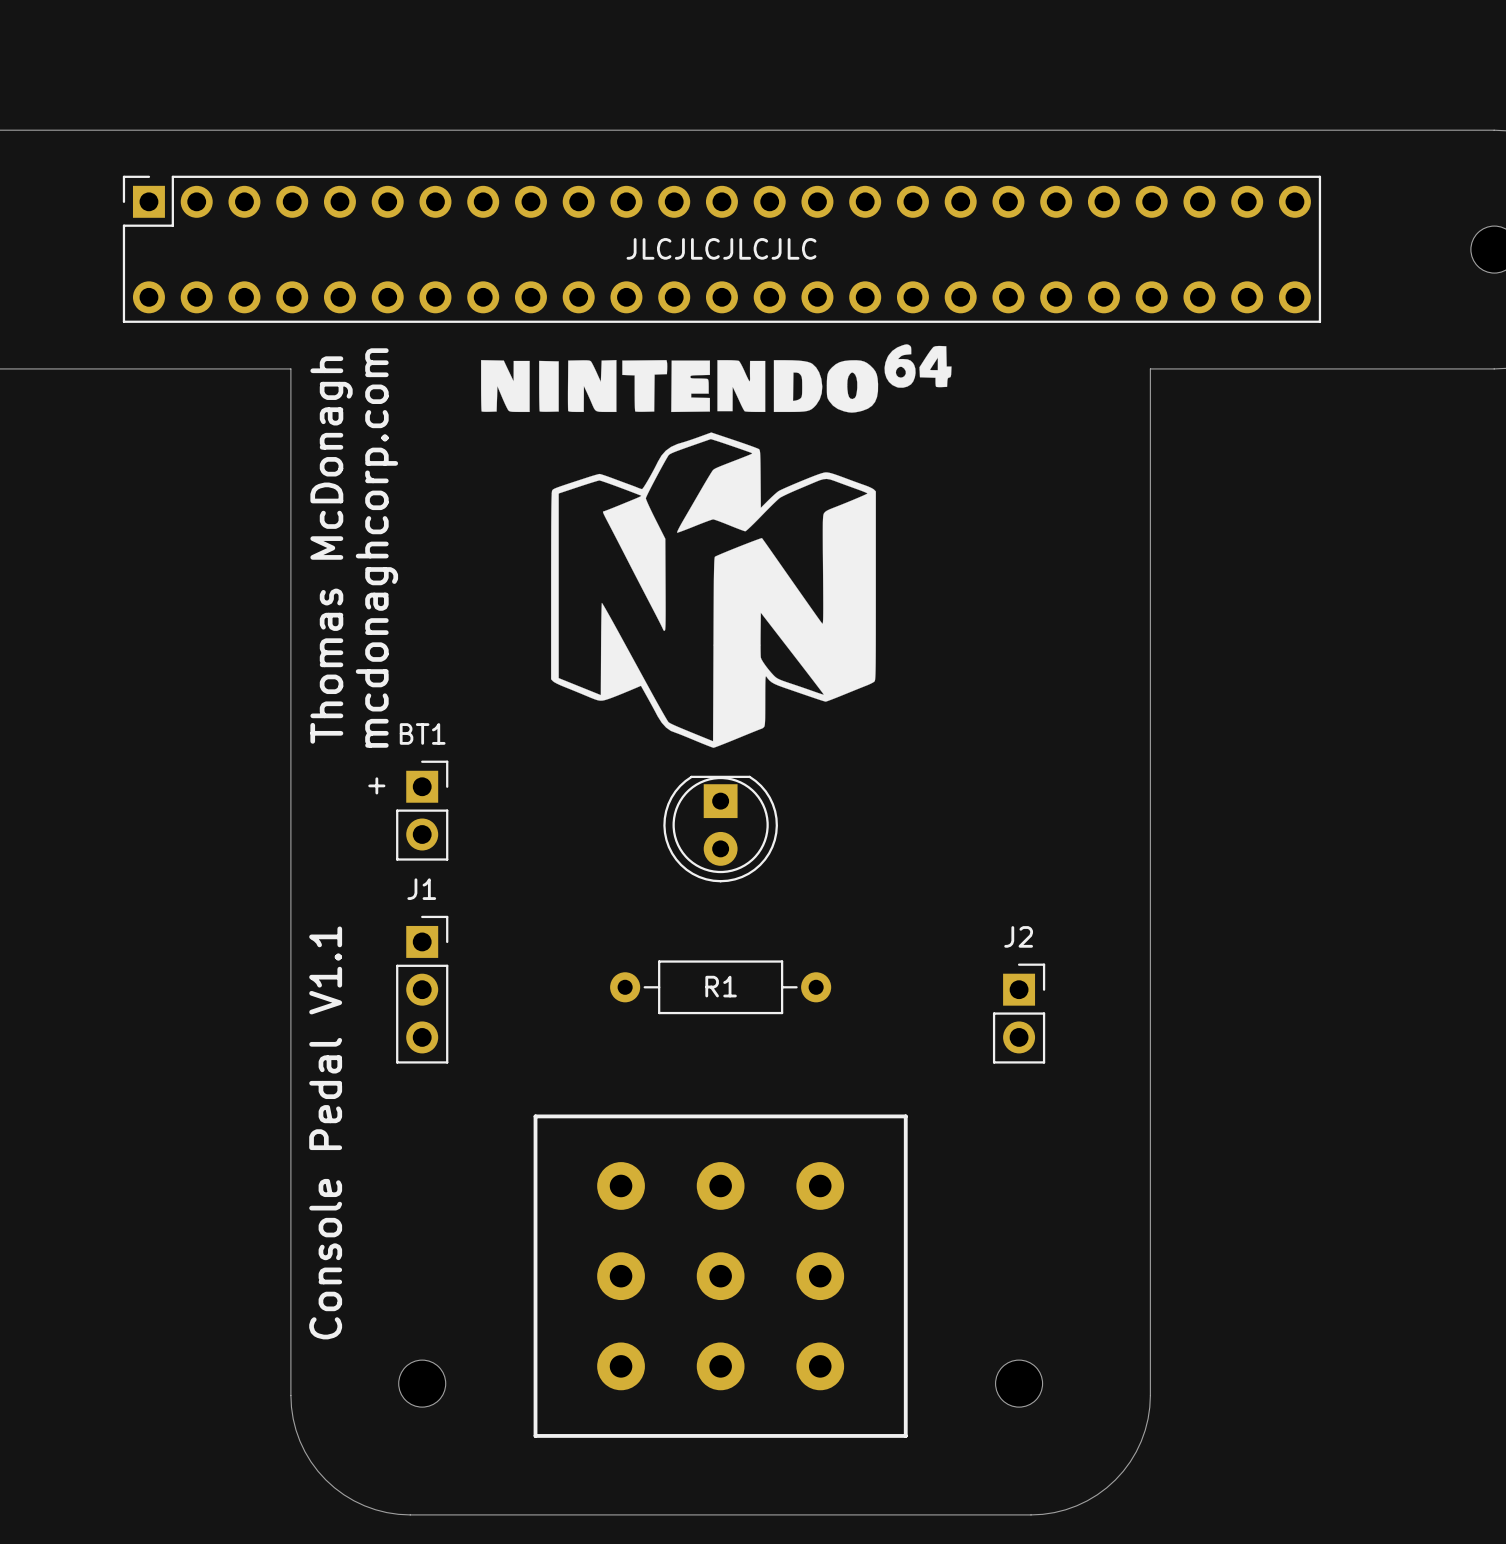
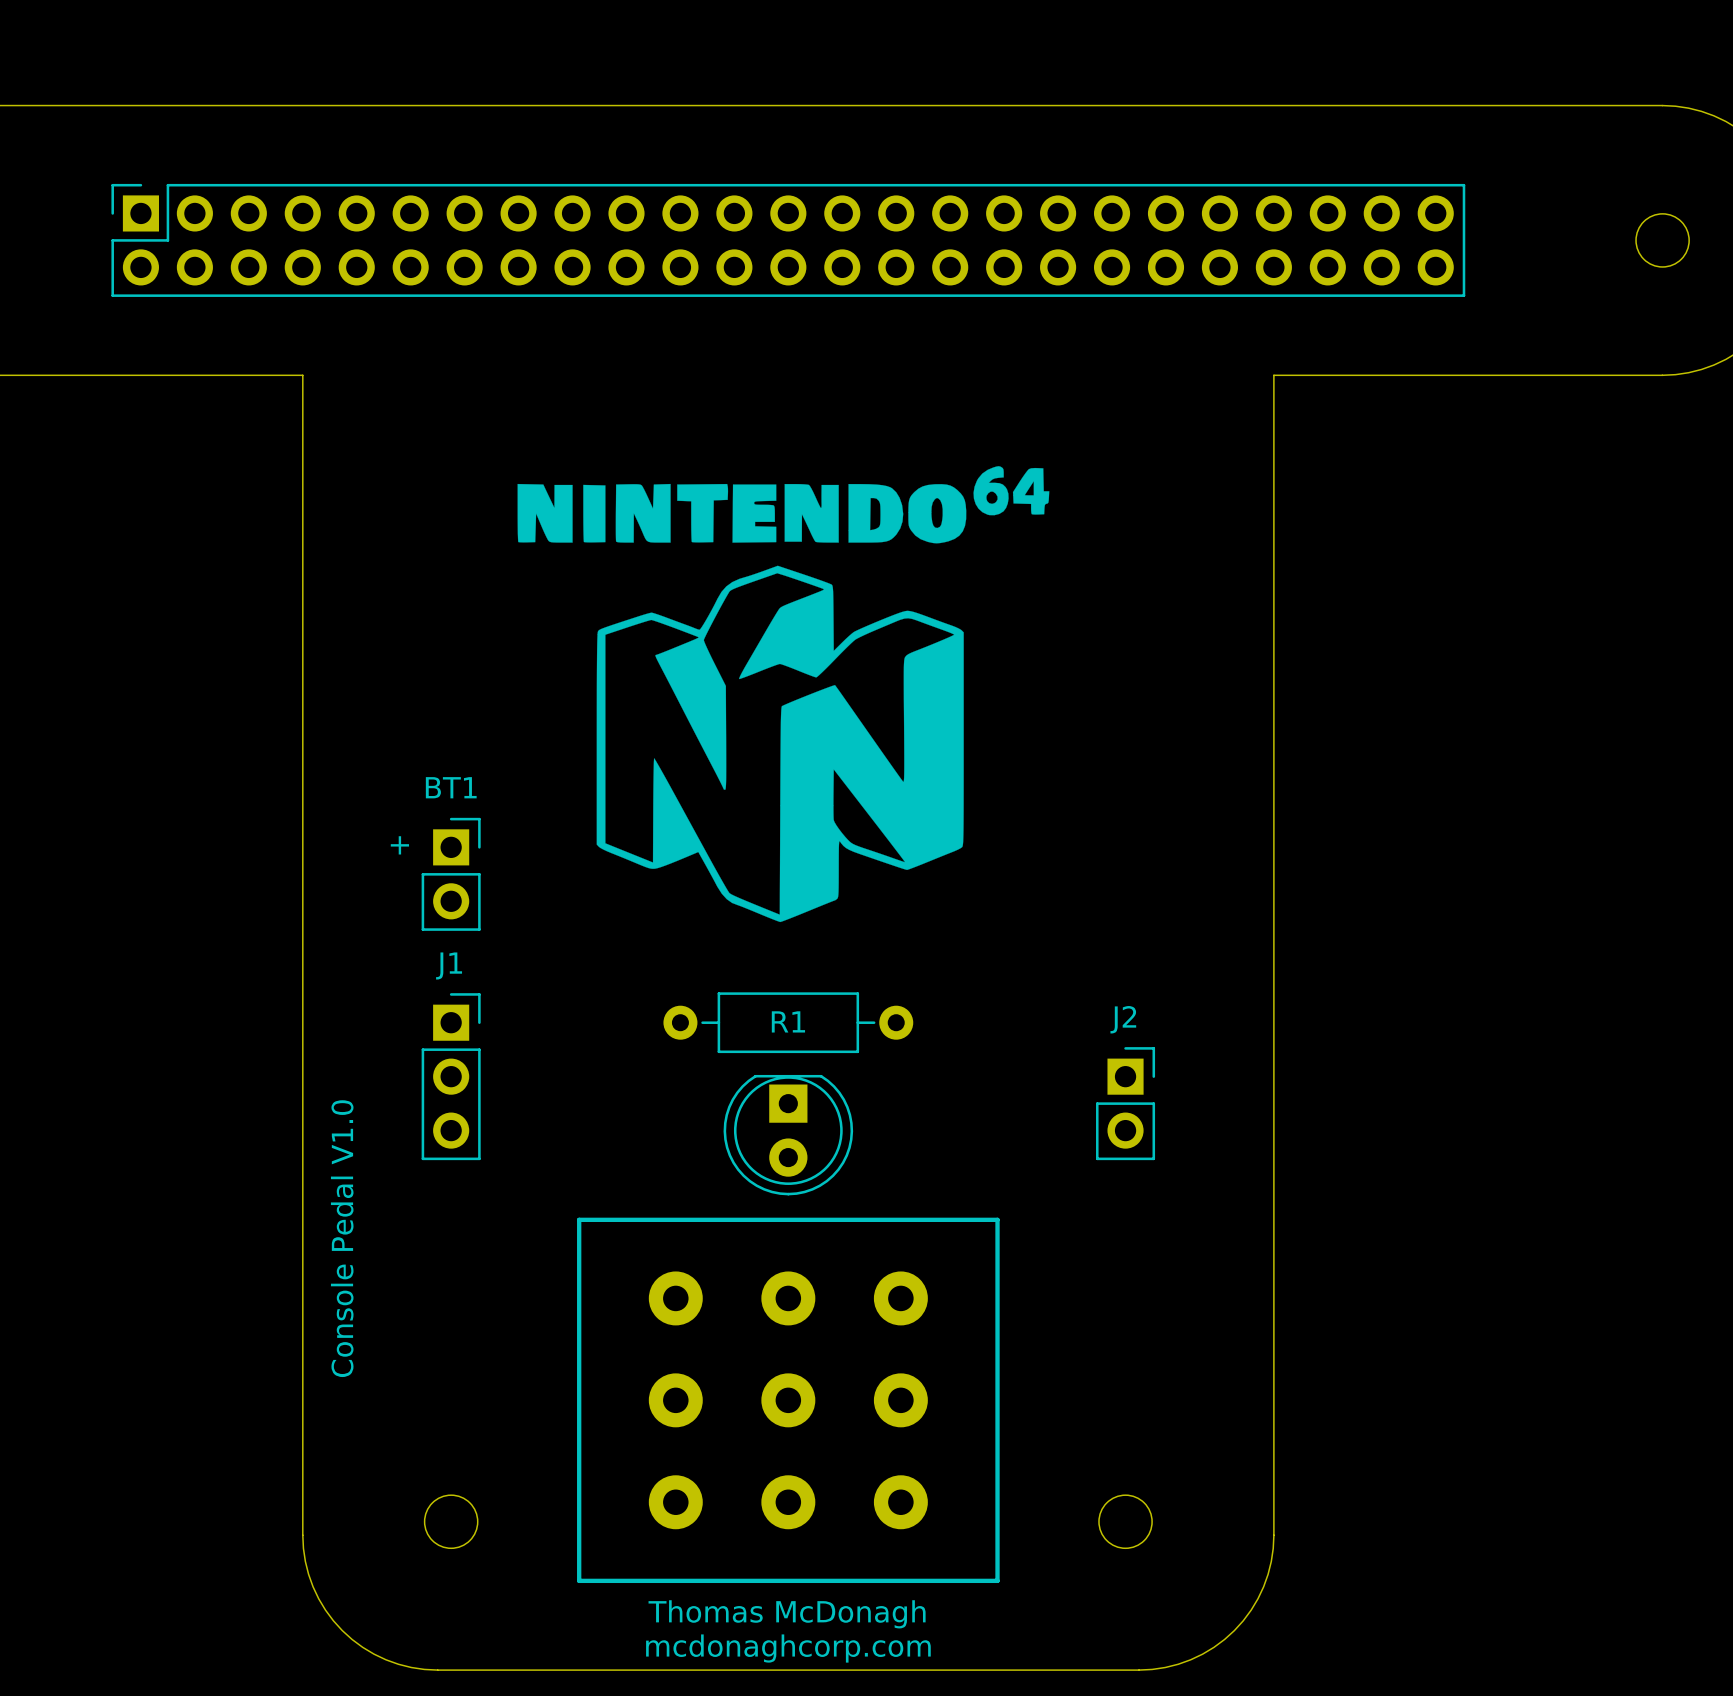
part footprint: [122, 175, 1322, 323] -> [111, 183, 1466, 297]
text: JLCJLCJLCJLC (721, 248) -> none
drawing position: (716, 546) -> (783, 694)
text: mcdonaghcorp.com (376, 548) -> none
text: Thomas McDonagh (331, 550) -> none
part position: (720, 829) -> (788, 1135)
R1 position: (720, 987) -> (788, 1022)
text: Console Pedal V1.1 (325, 1132) -> Console Pedal V1.0 (342, 1238)
text: none -> Thomas McDonagh (787, 1614)
text: none -> mcdonaghcorp.com (788, 1648)

